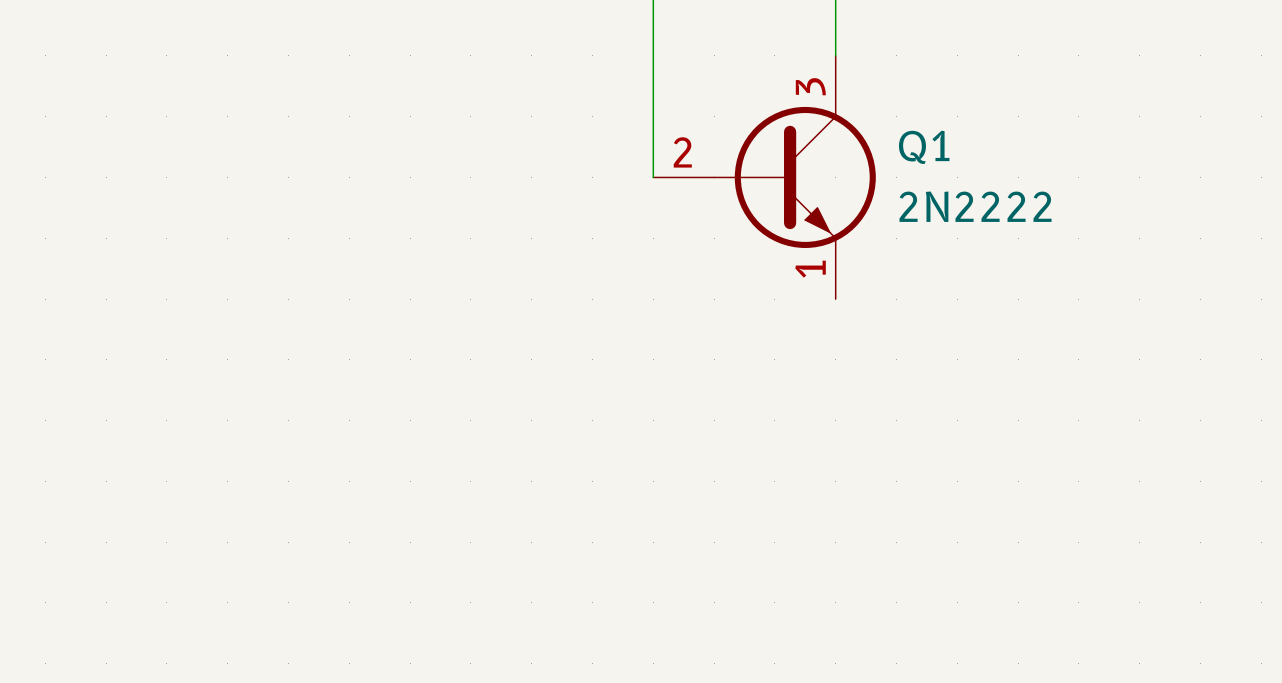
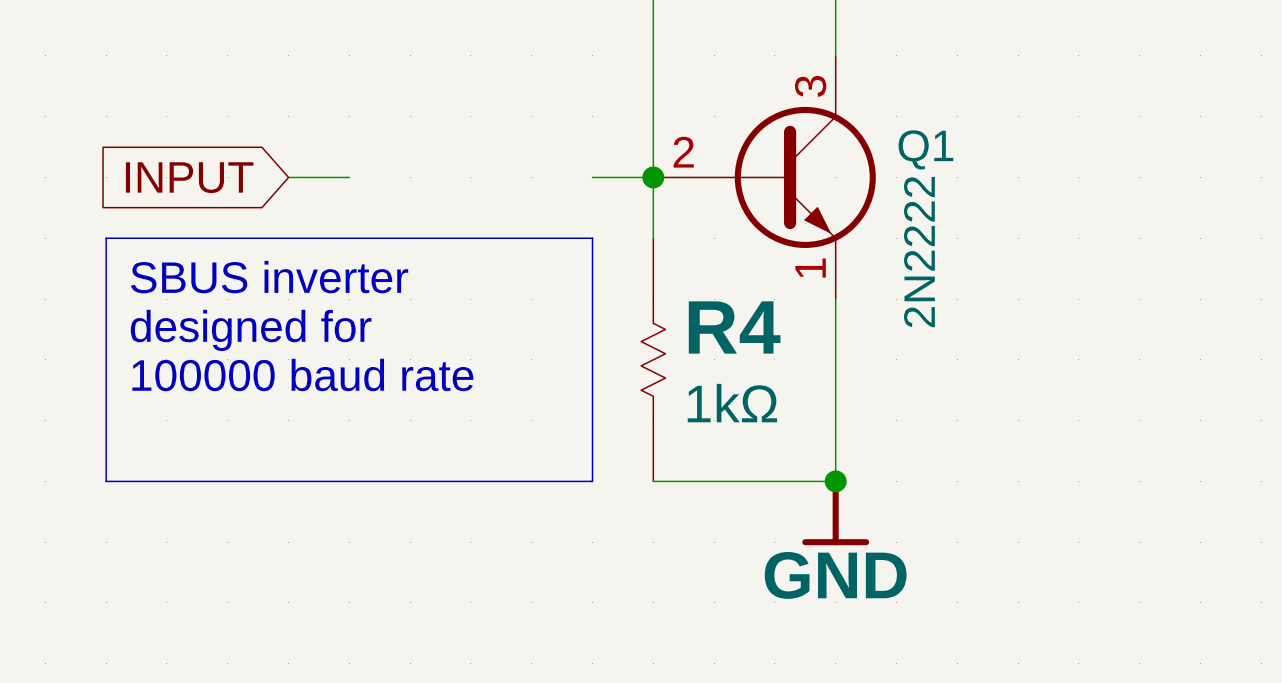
global label: none -> INPUT (189, 177)
wire: none -> (288, 177) (349, 177)
wire: none -> (592, 177) (653, 177) (653, 238)
junction: none -> (653, 177)
Q1 value rotation: 0° (975, 206) -> 90° counterclockwise (919, 252)
line: none -> (106, 238) (592, 238) (592, 481) (106, 481) (106, 238)
text: none -> SBUS inverter (269, 277)
wire: none -> (835, 299) (835, 481) (653, 481)
text: none -> designed for (251, 330)
R4: none -> 1kΩ (653, 359)
text: none -> 100000 baud rate (302, 374)
junction: none -> (835, 481)
power symbol: none -> GND (835, 511)

